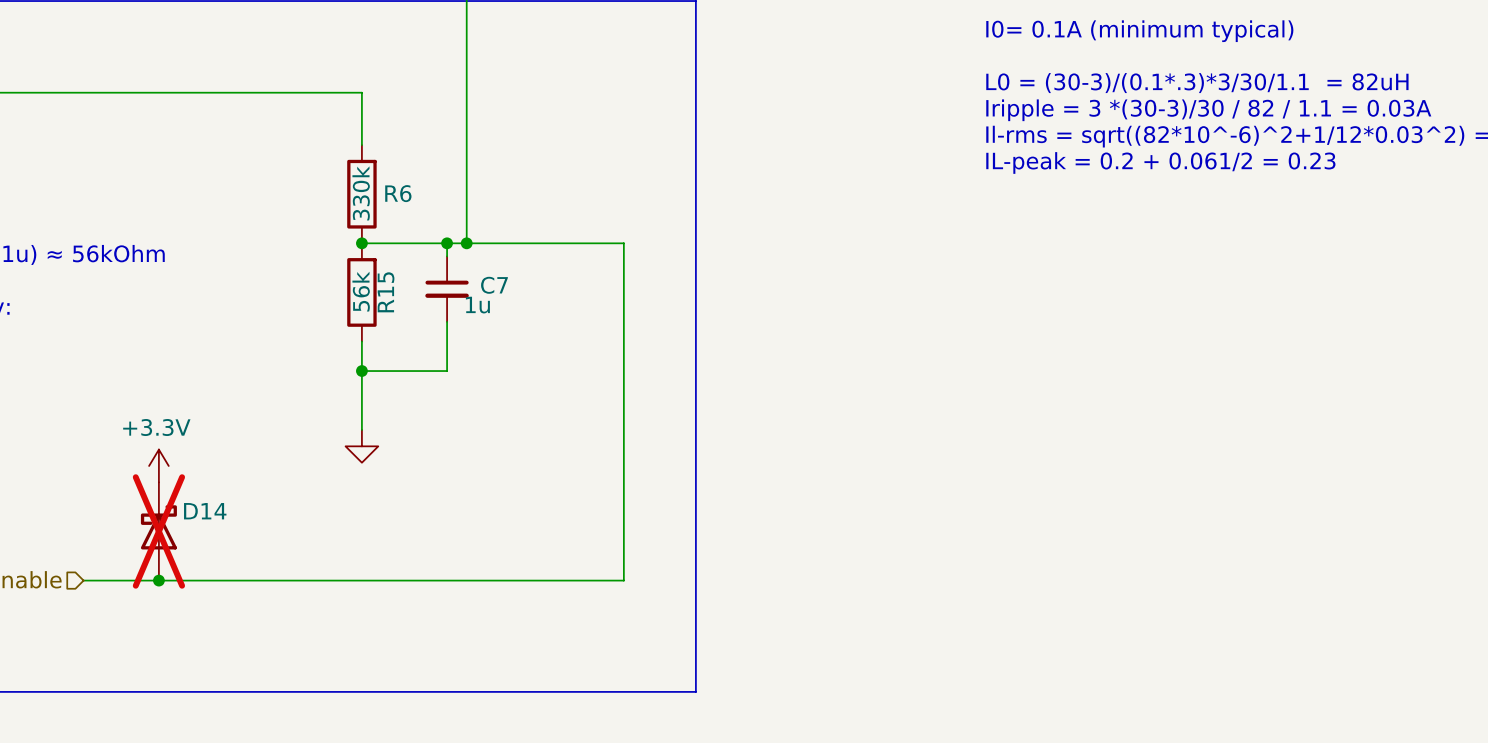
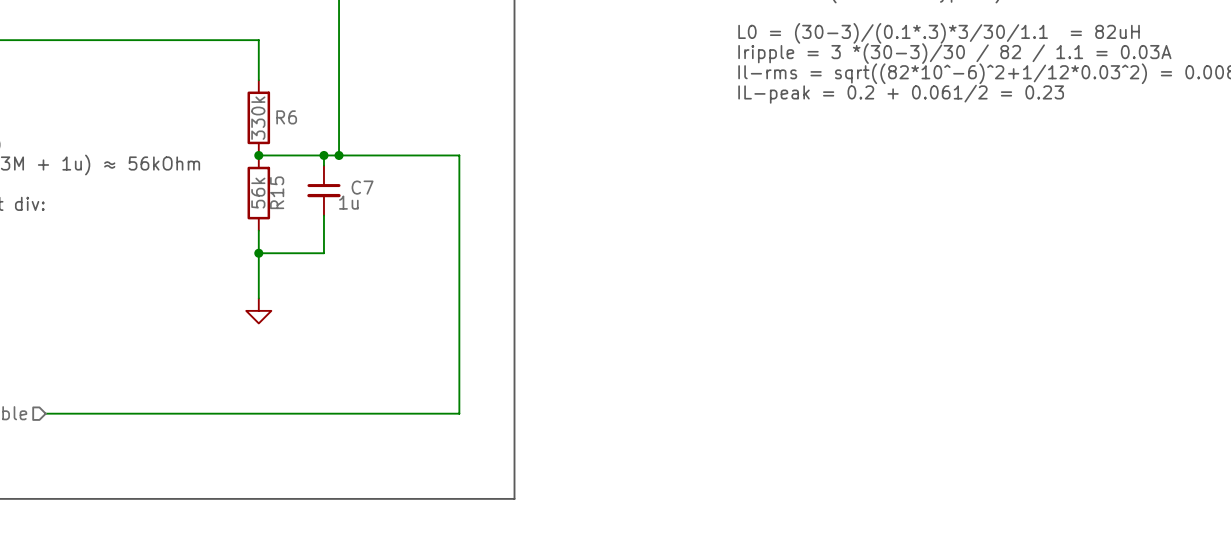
power symbol: +3.3V (158, 465) -> none
D14: (158, 531) -> none
junction: (158, 580) -> none

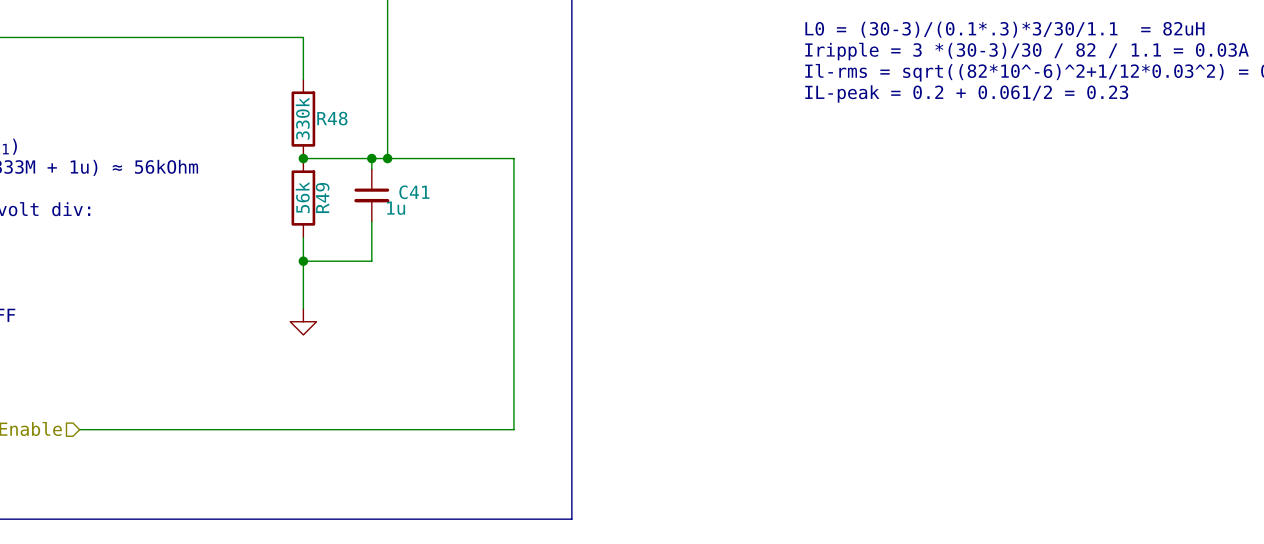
R6 name: R6 (286, 117) -> R48 (332, 118)
C7 name: C7 (362, 187) -> C41 (414, 192)
R15 name: R15 (277, 192) -> R49 (322, 198)

